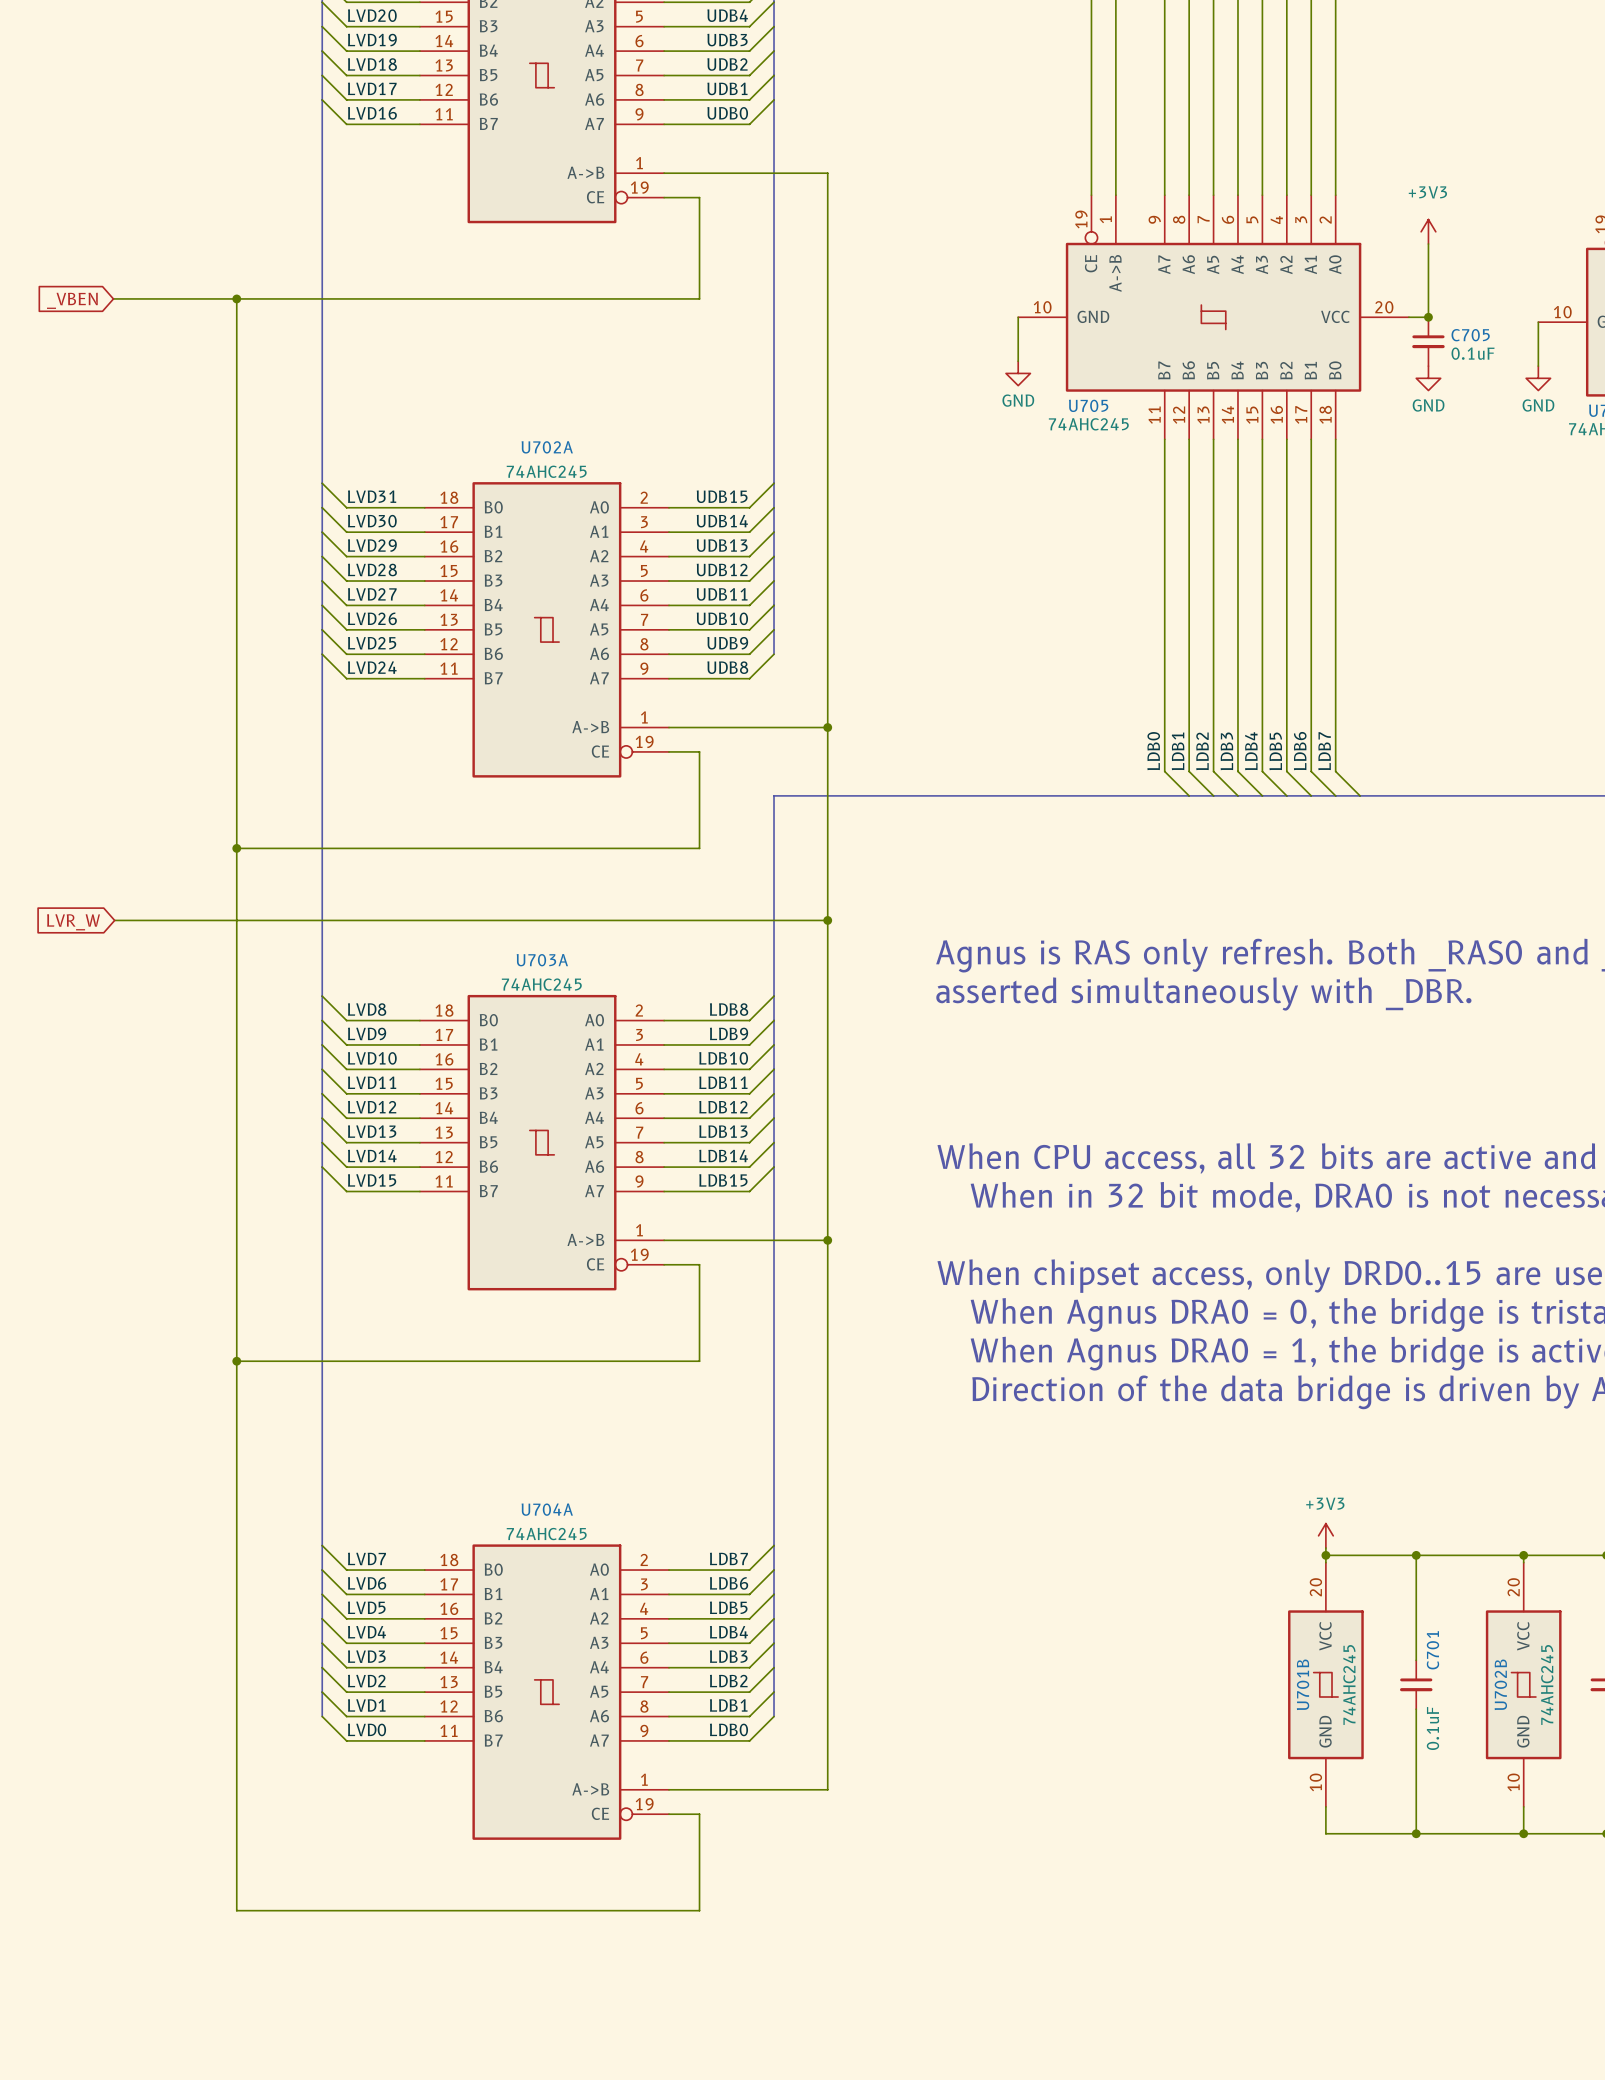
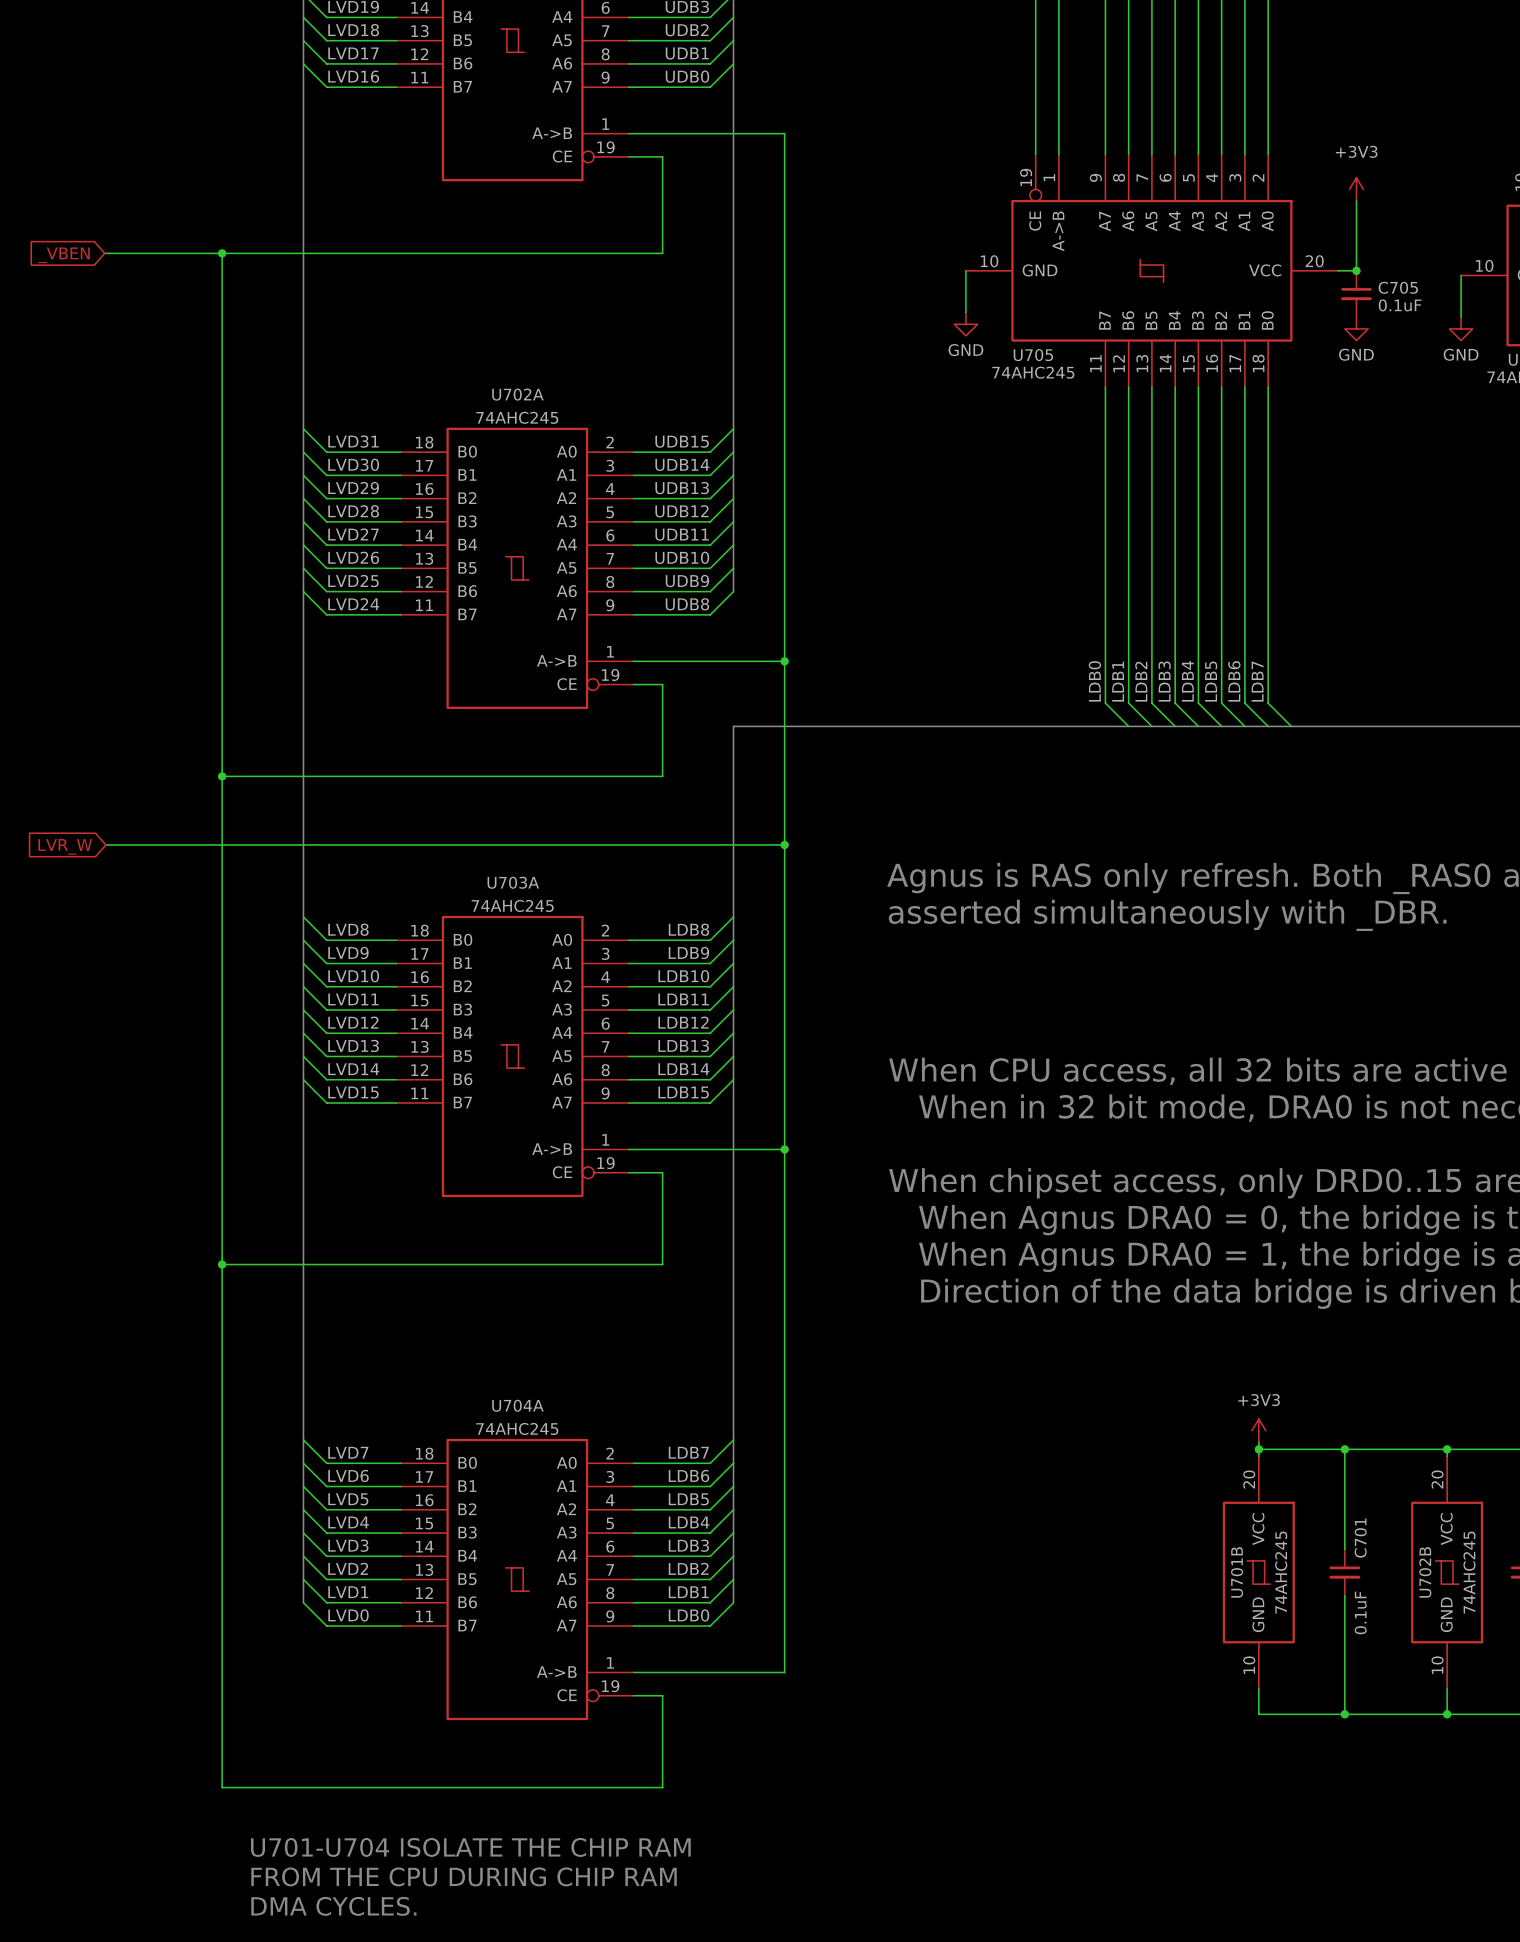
text: none -> U701-U704 ISOLATE THE CHIP RAM (470, 1847)
text: none -> FROM THE CPU DURING CHIP RAM (464, 1876)
text: none -> DMA CYCLES. (333, 1906)

